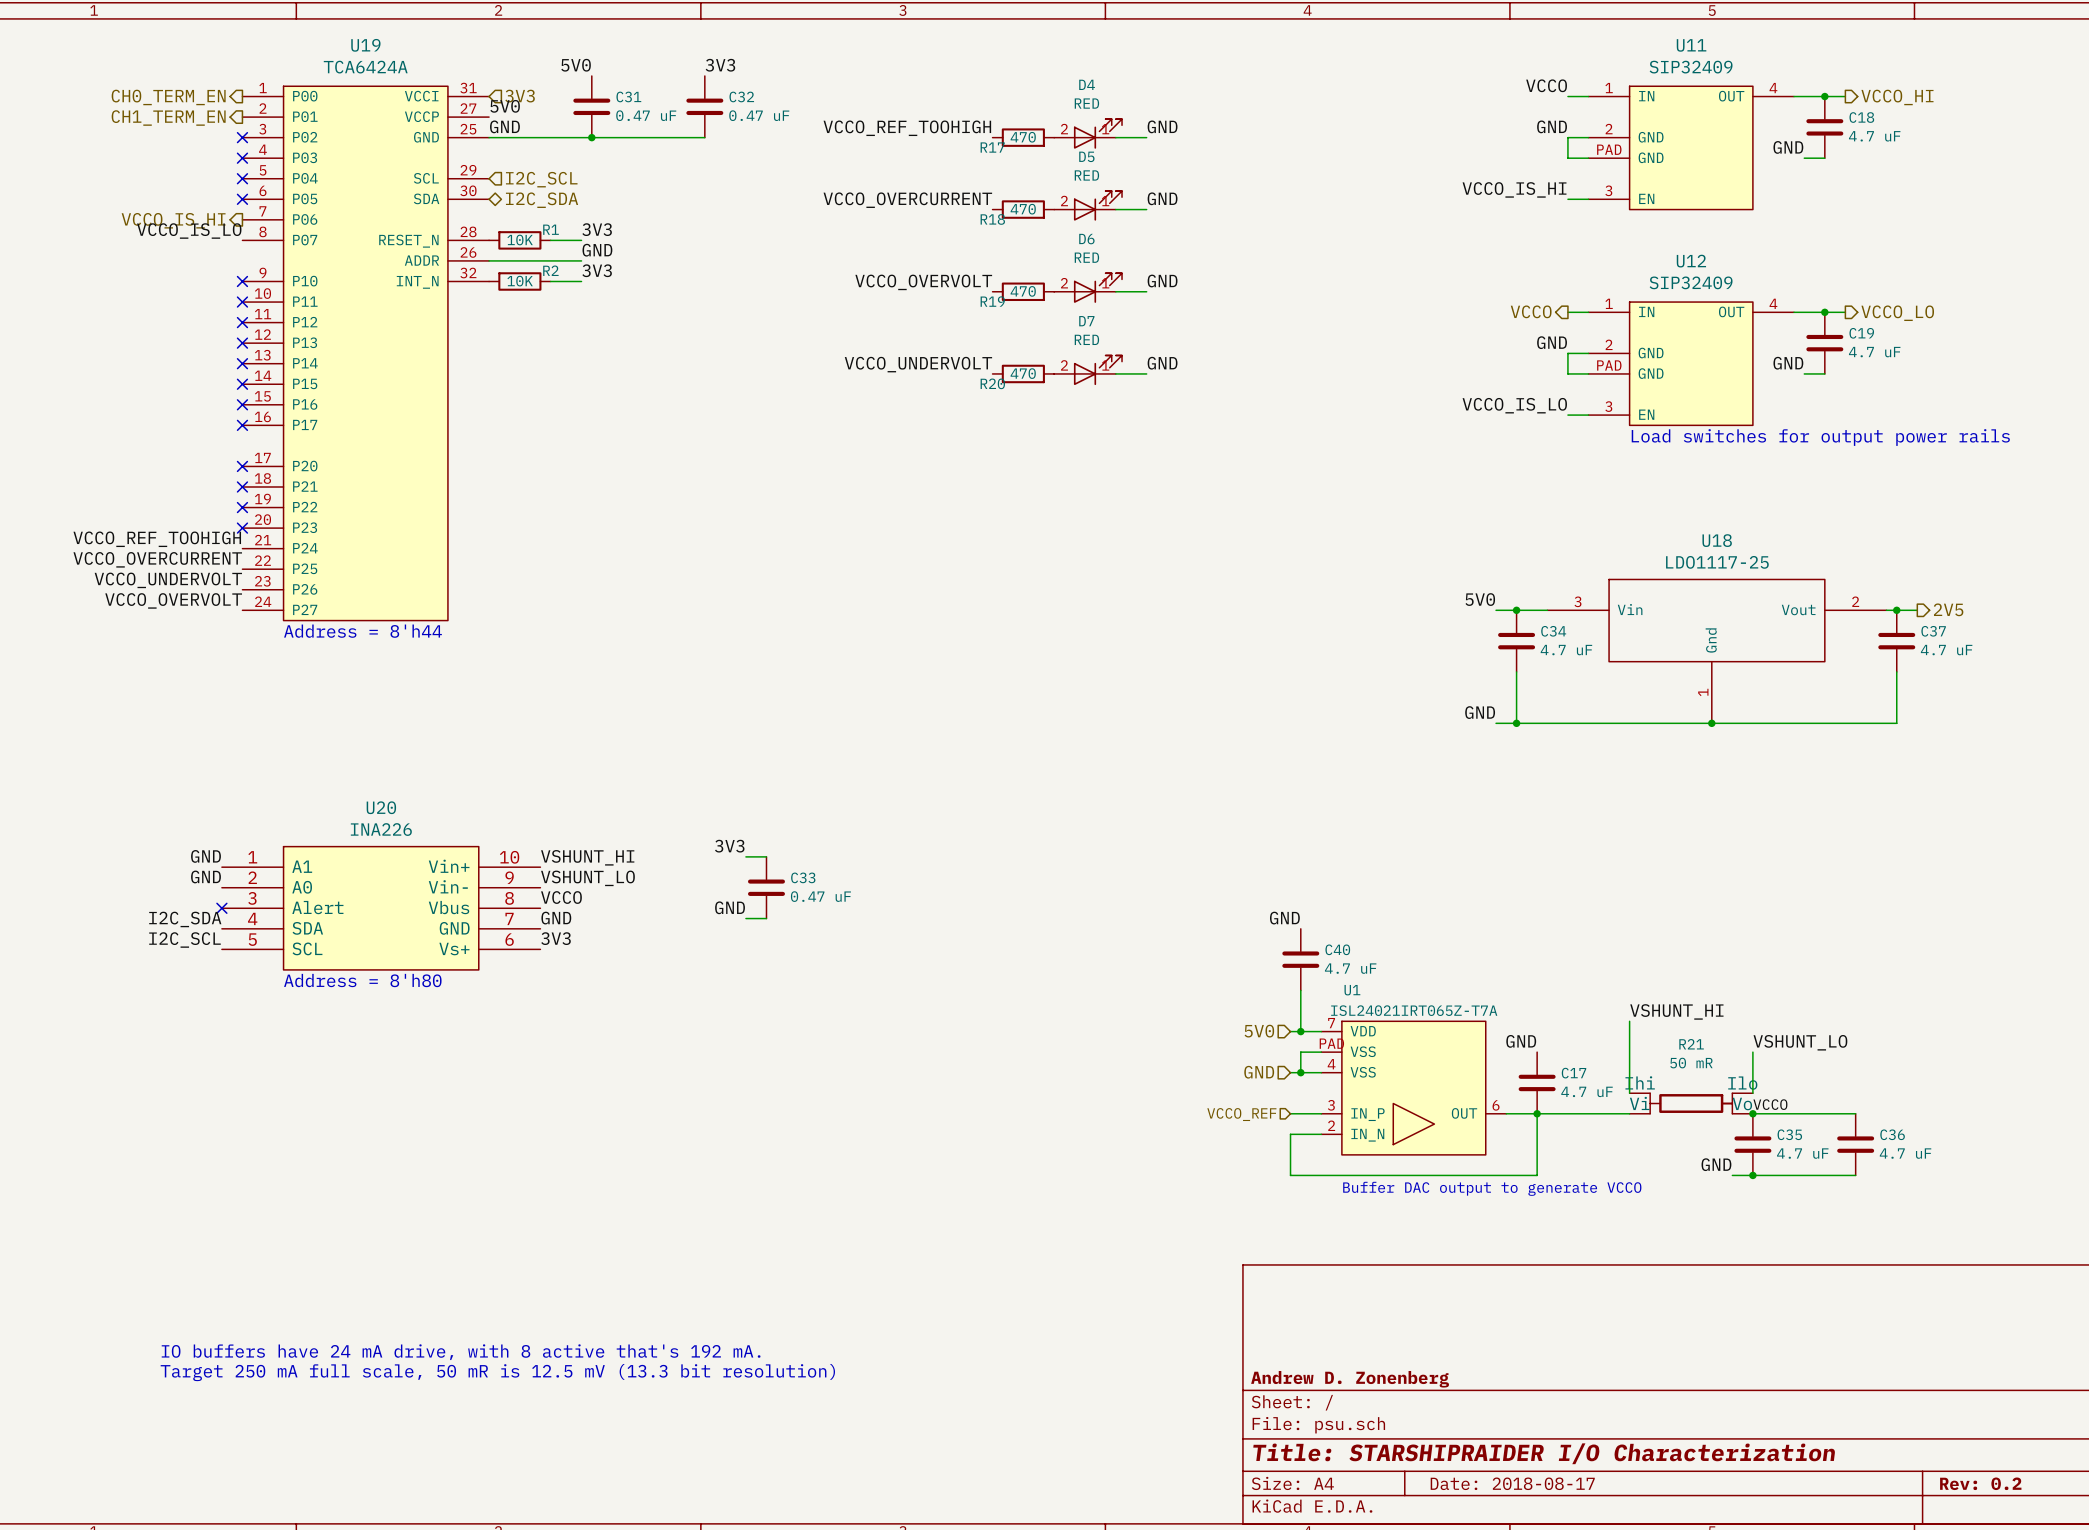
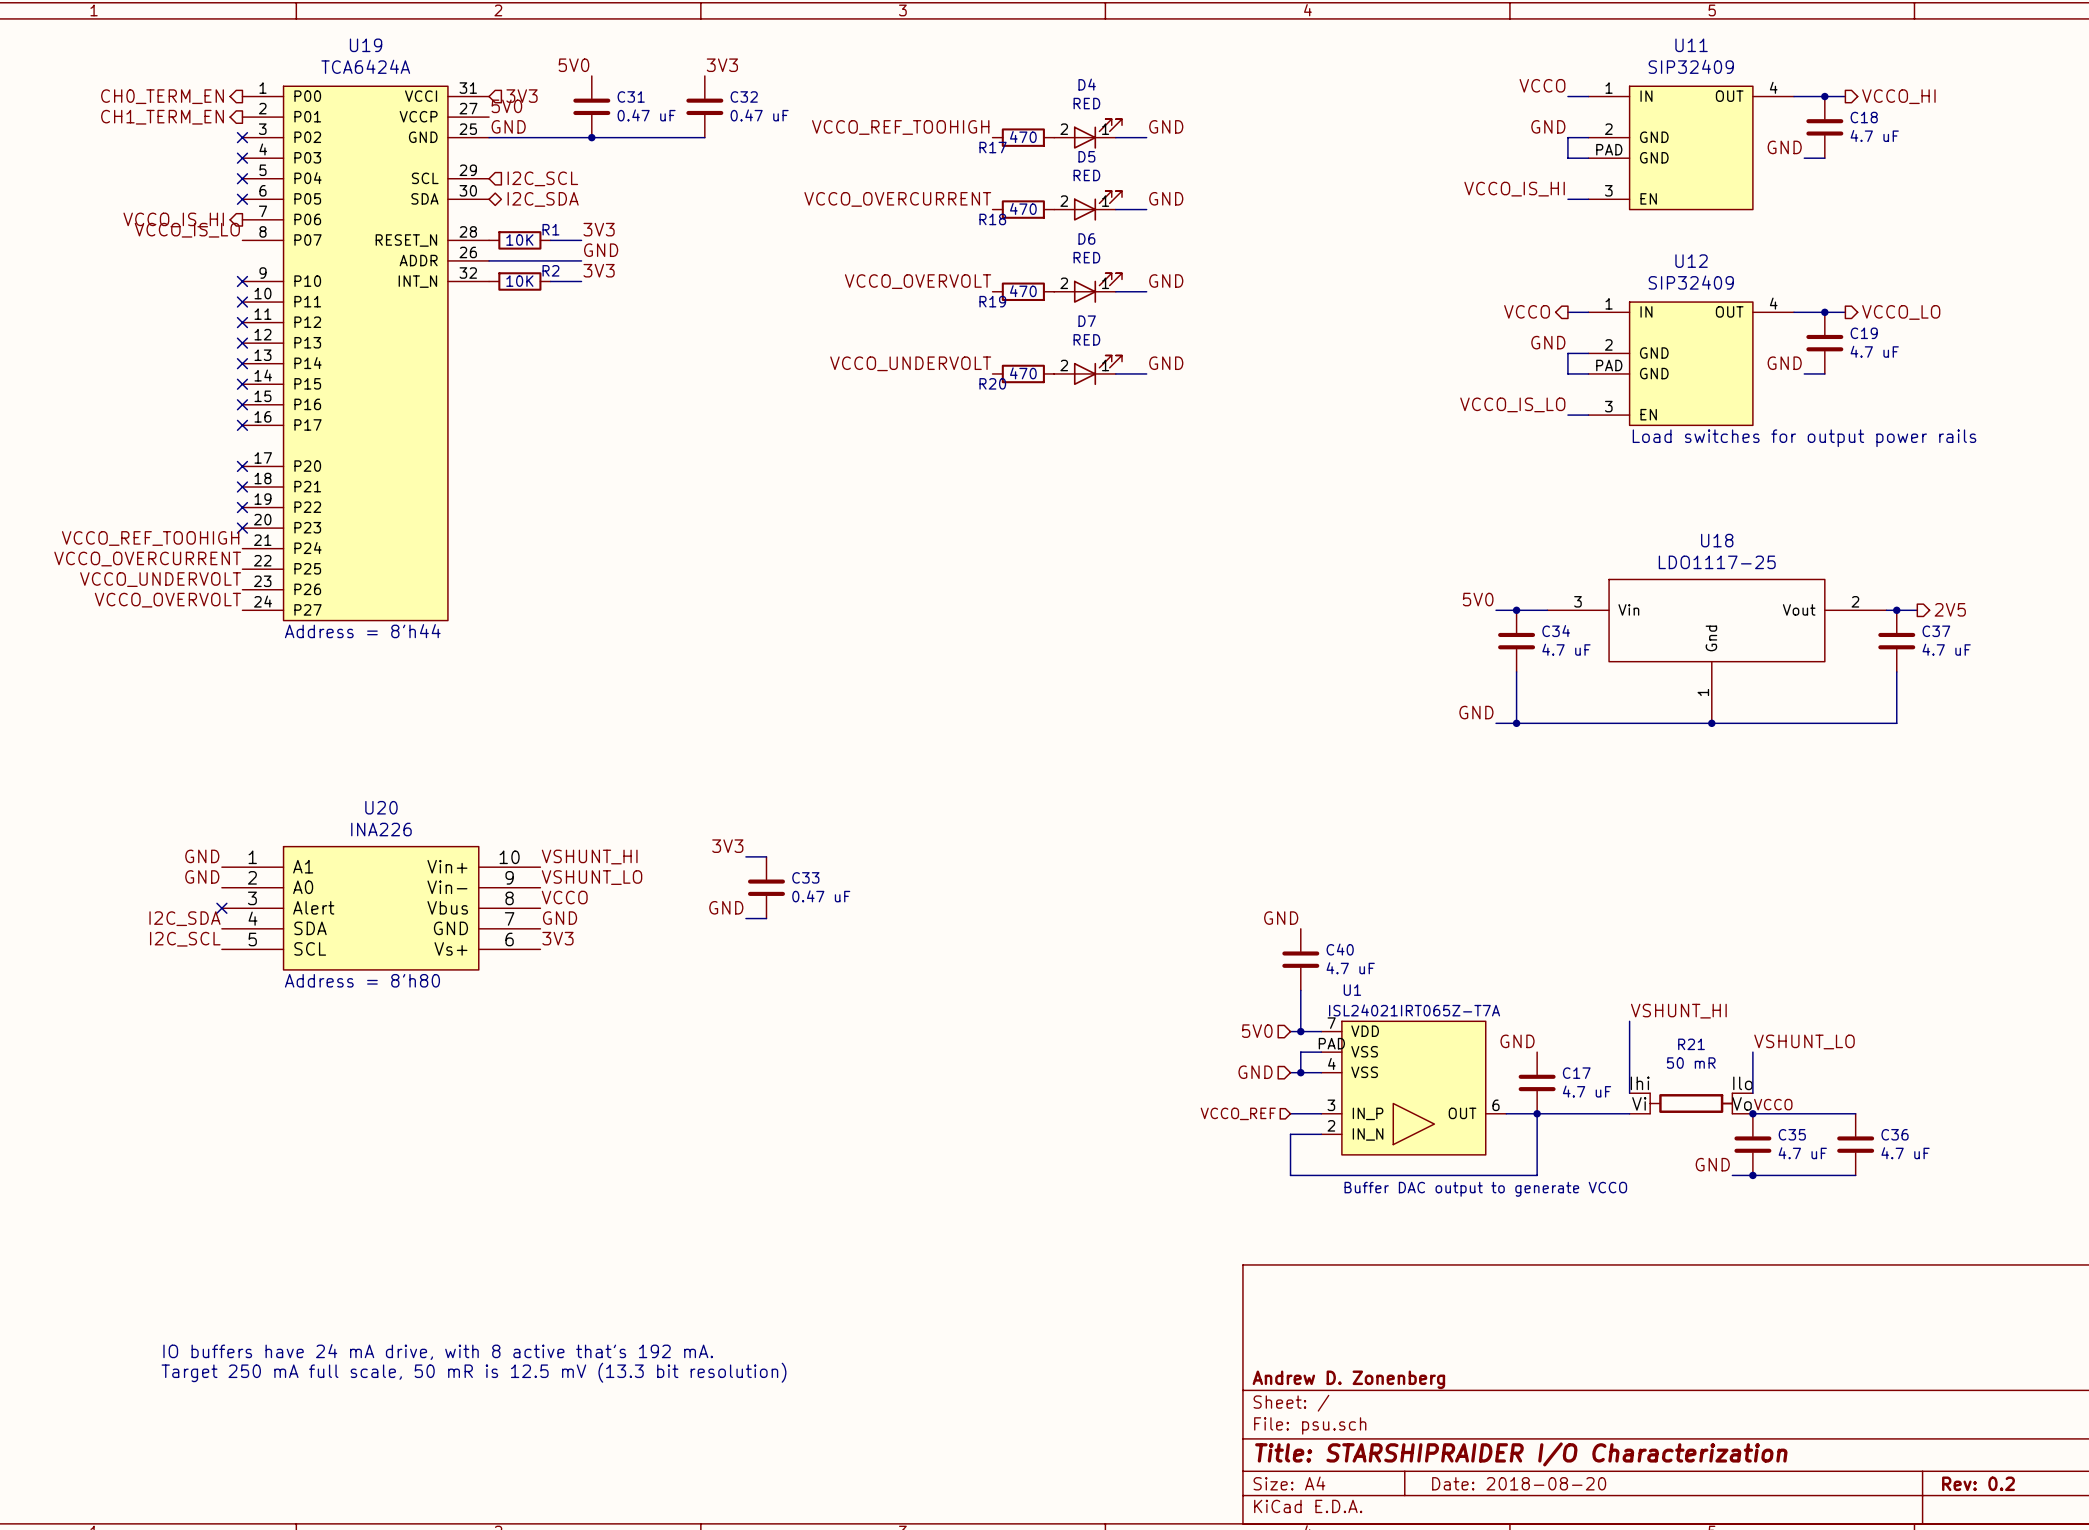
title block: Date: 2018-08-17 (1512, 1483) -> Date: 2018-08-20 (1519, 1483)

